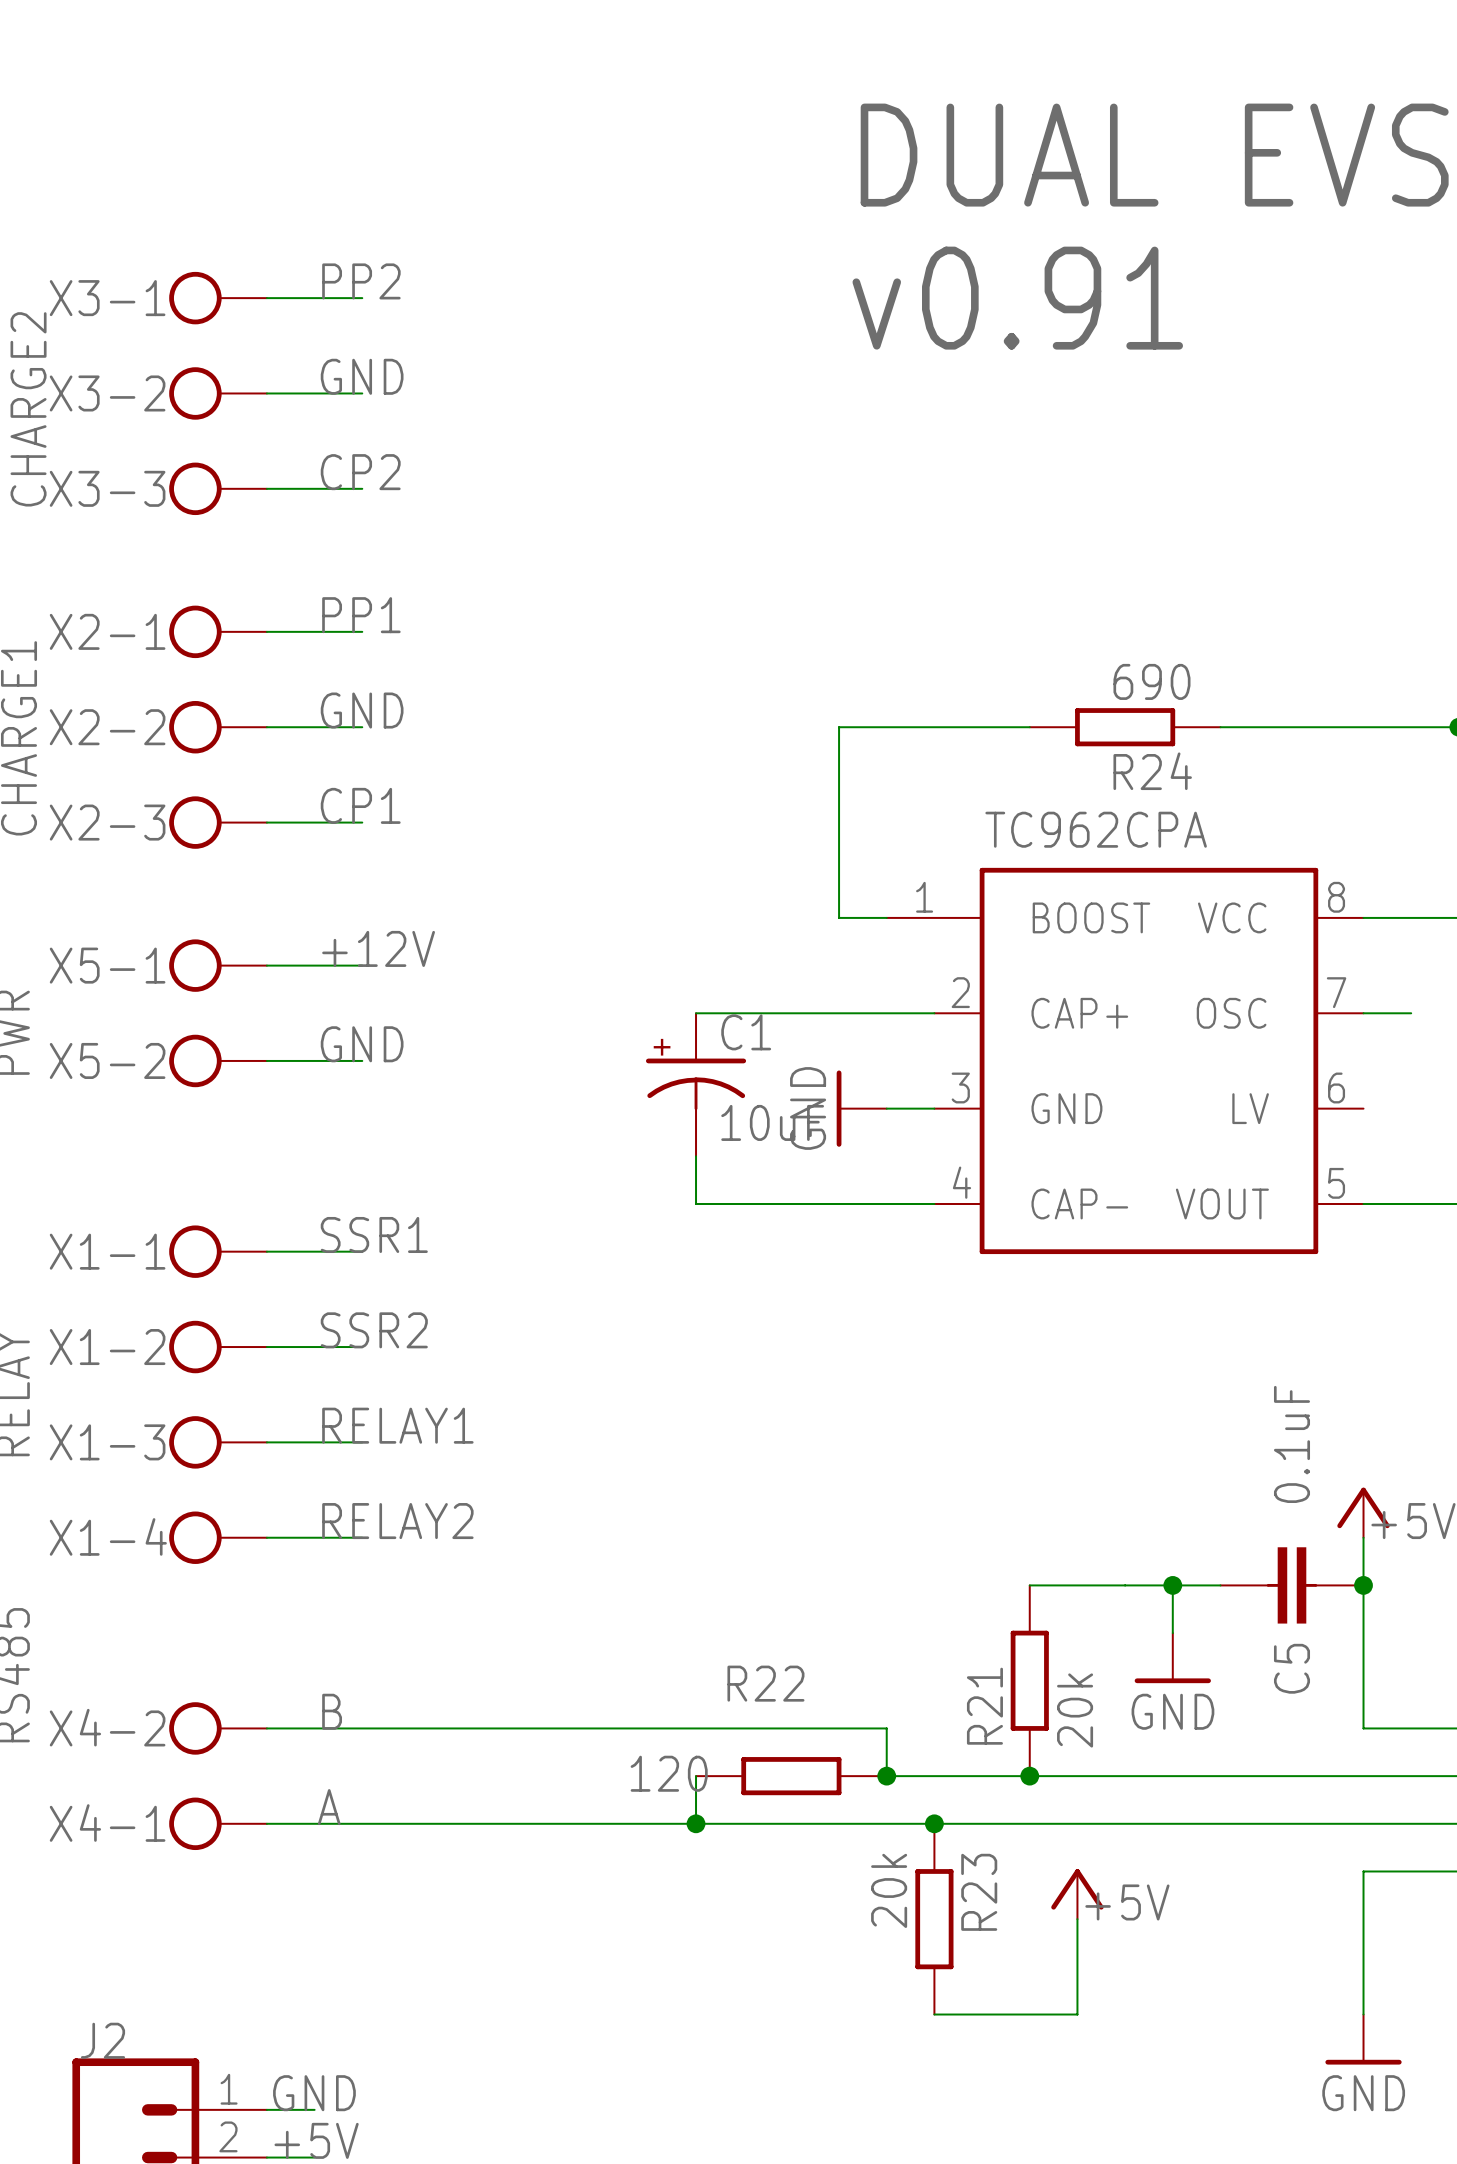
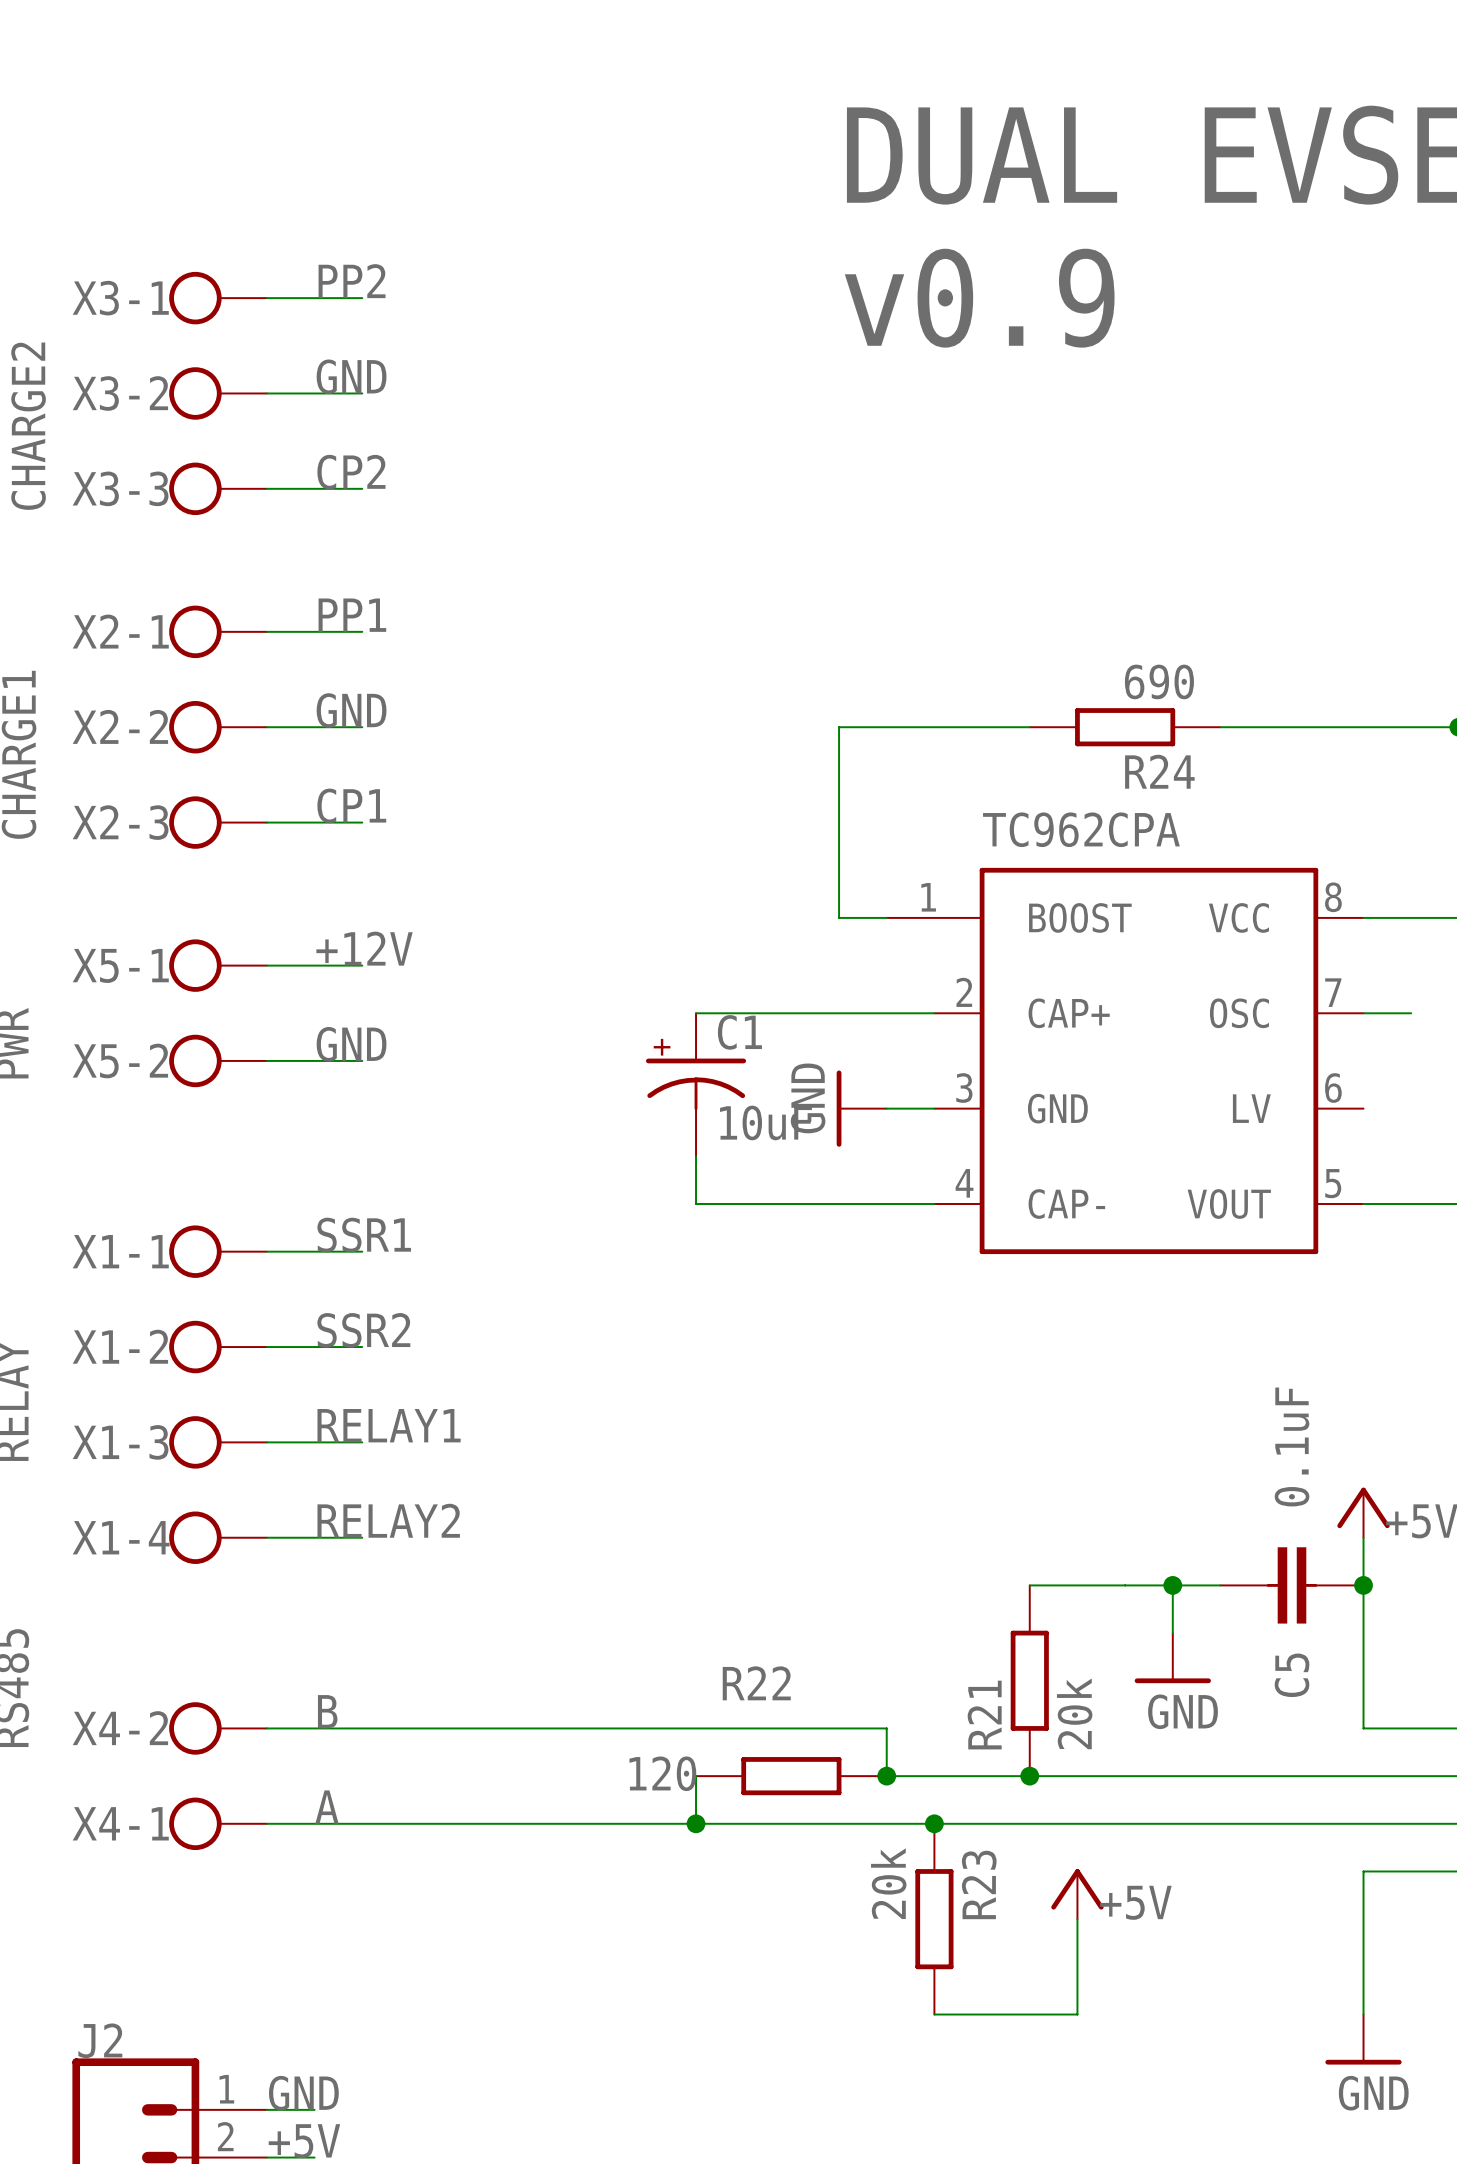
text: v0.91 (1017, 298) -> v0.9 (979, 298)

